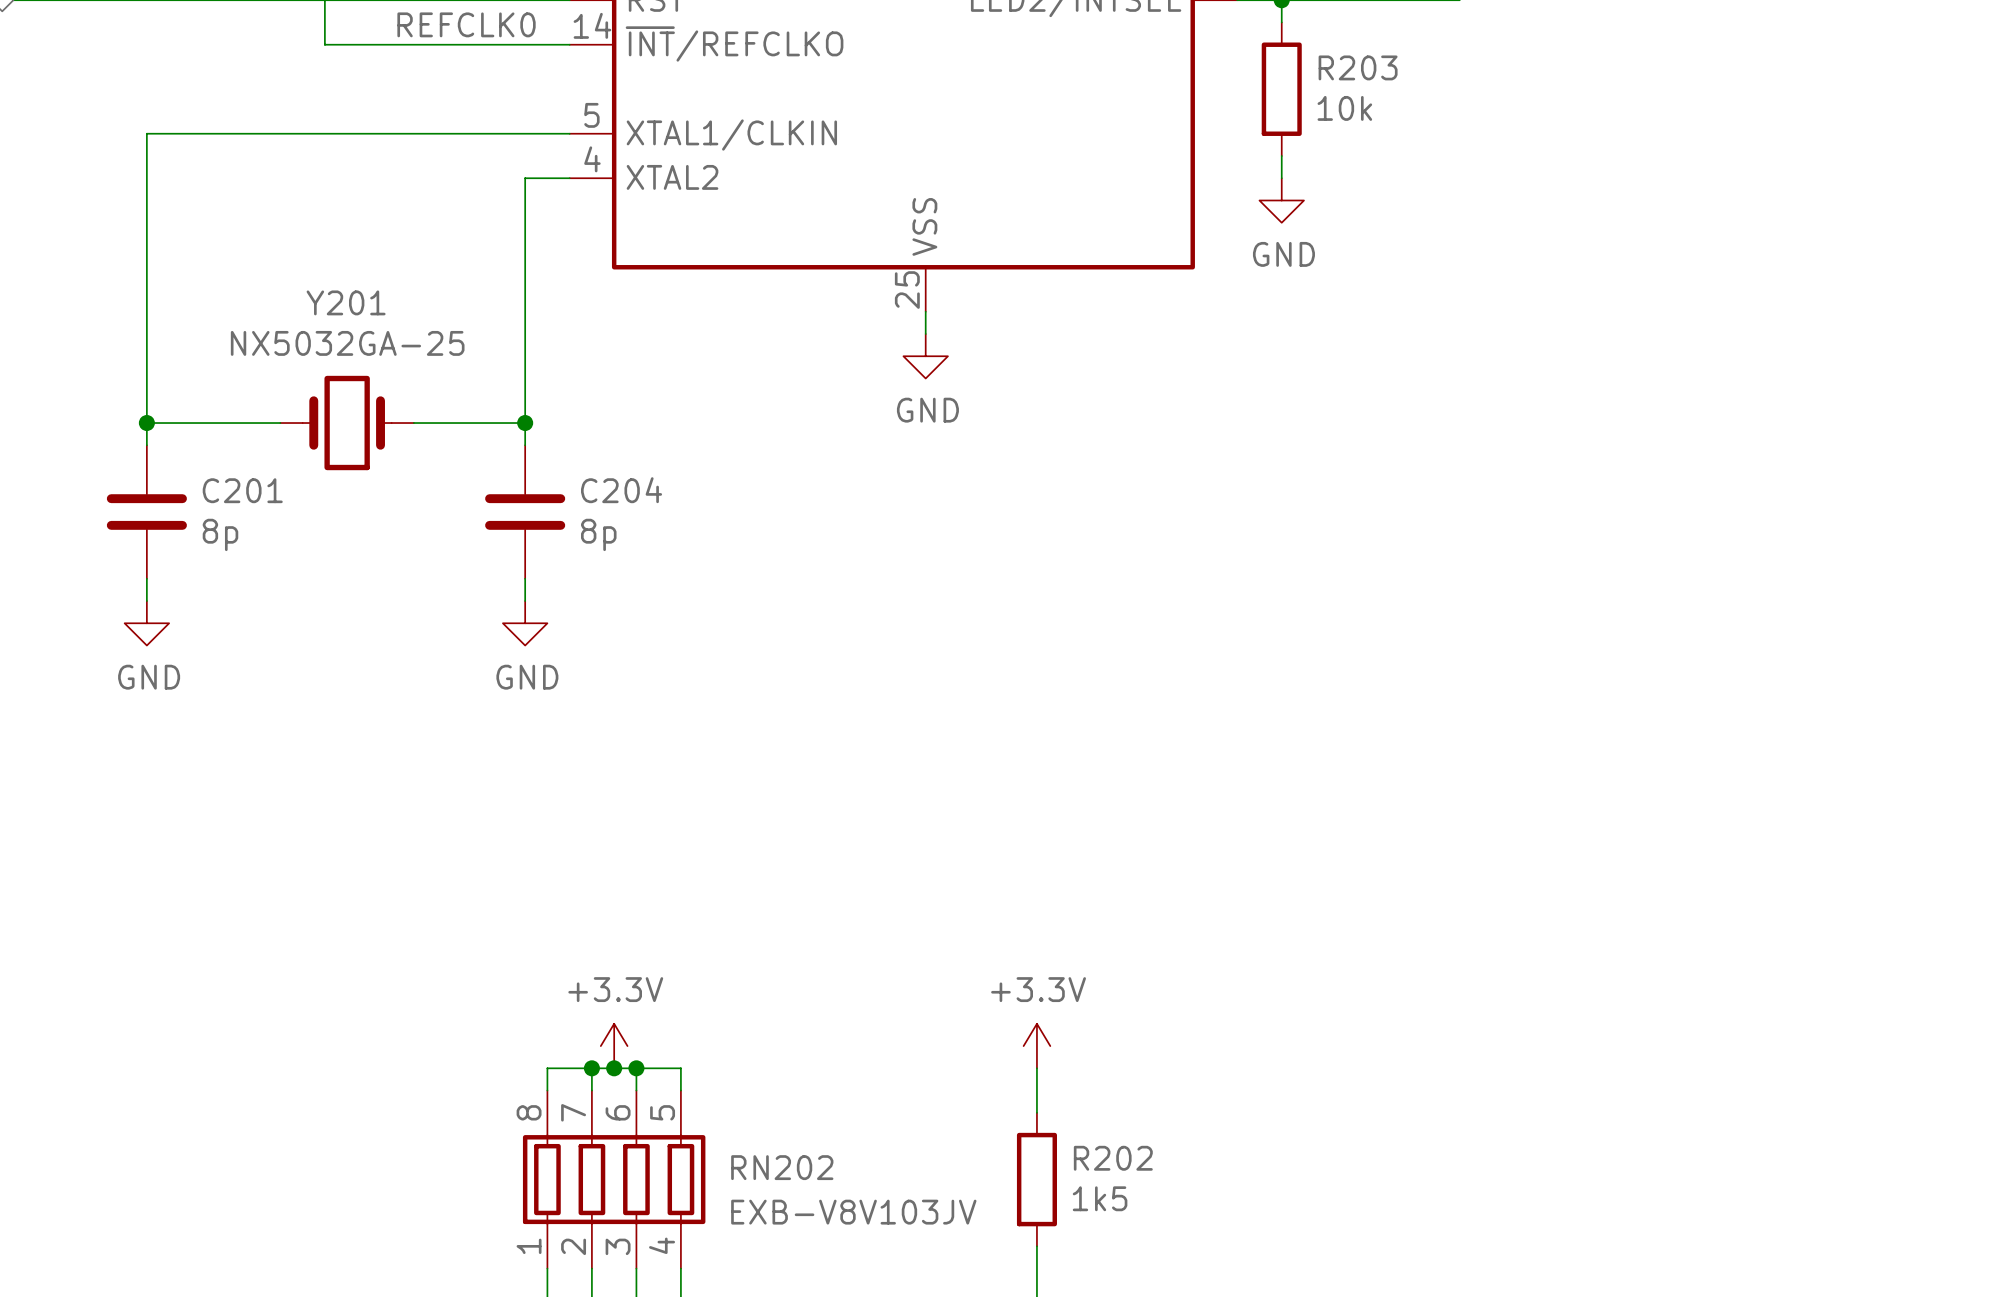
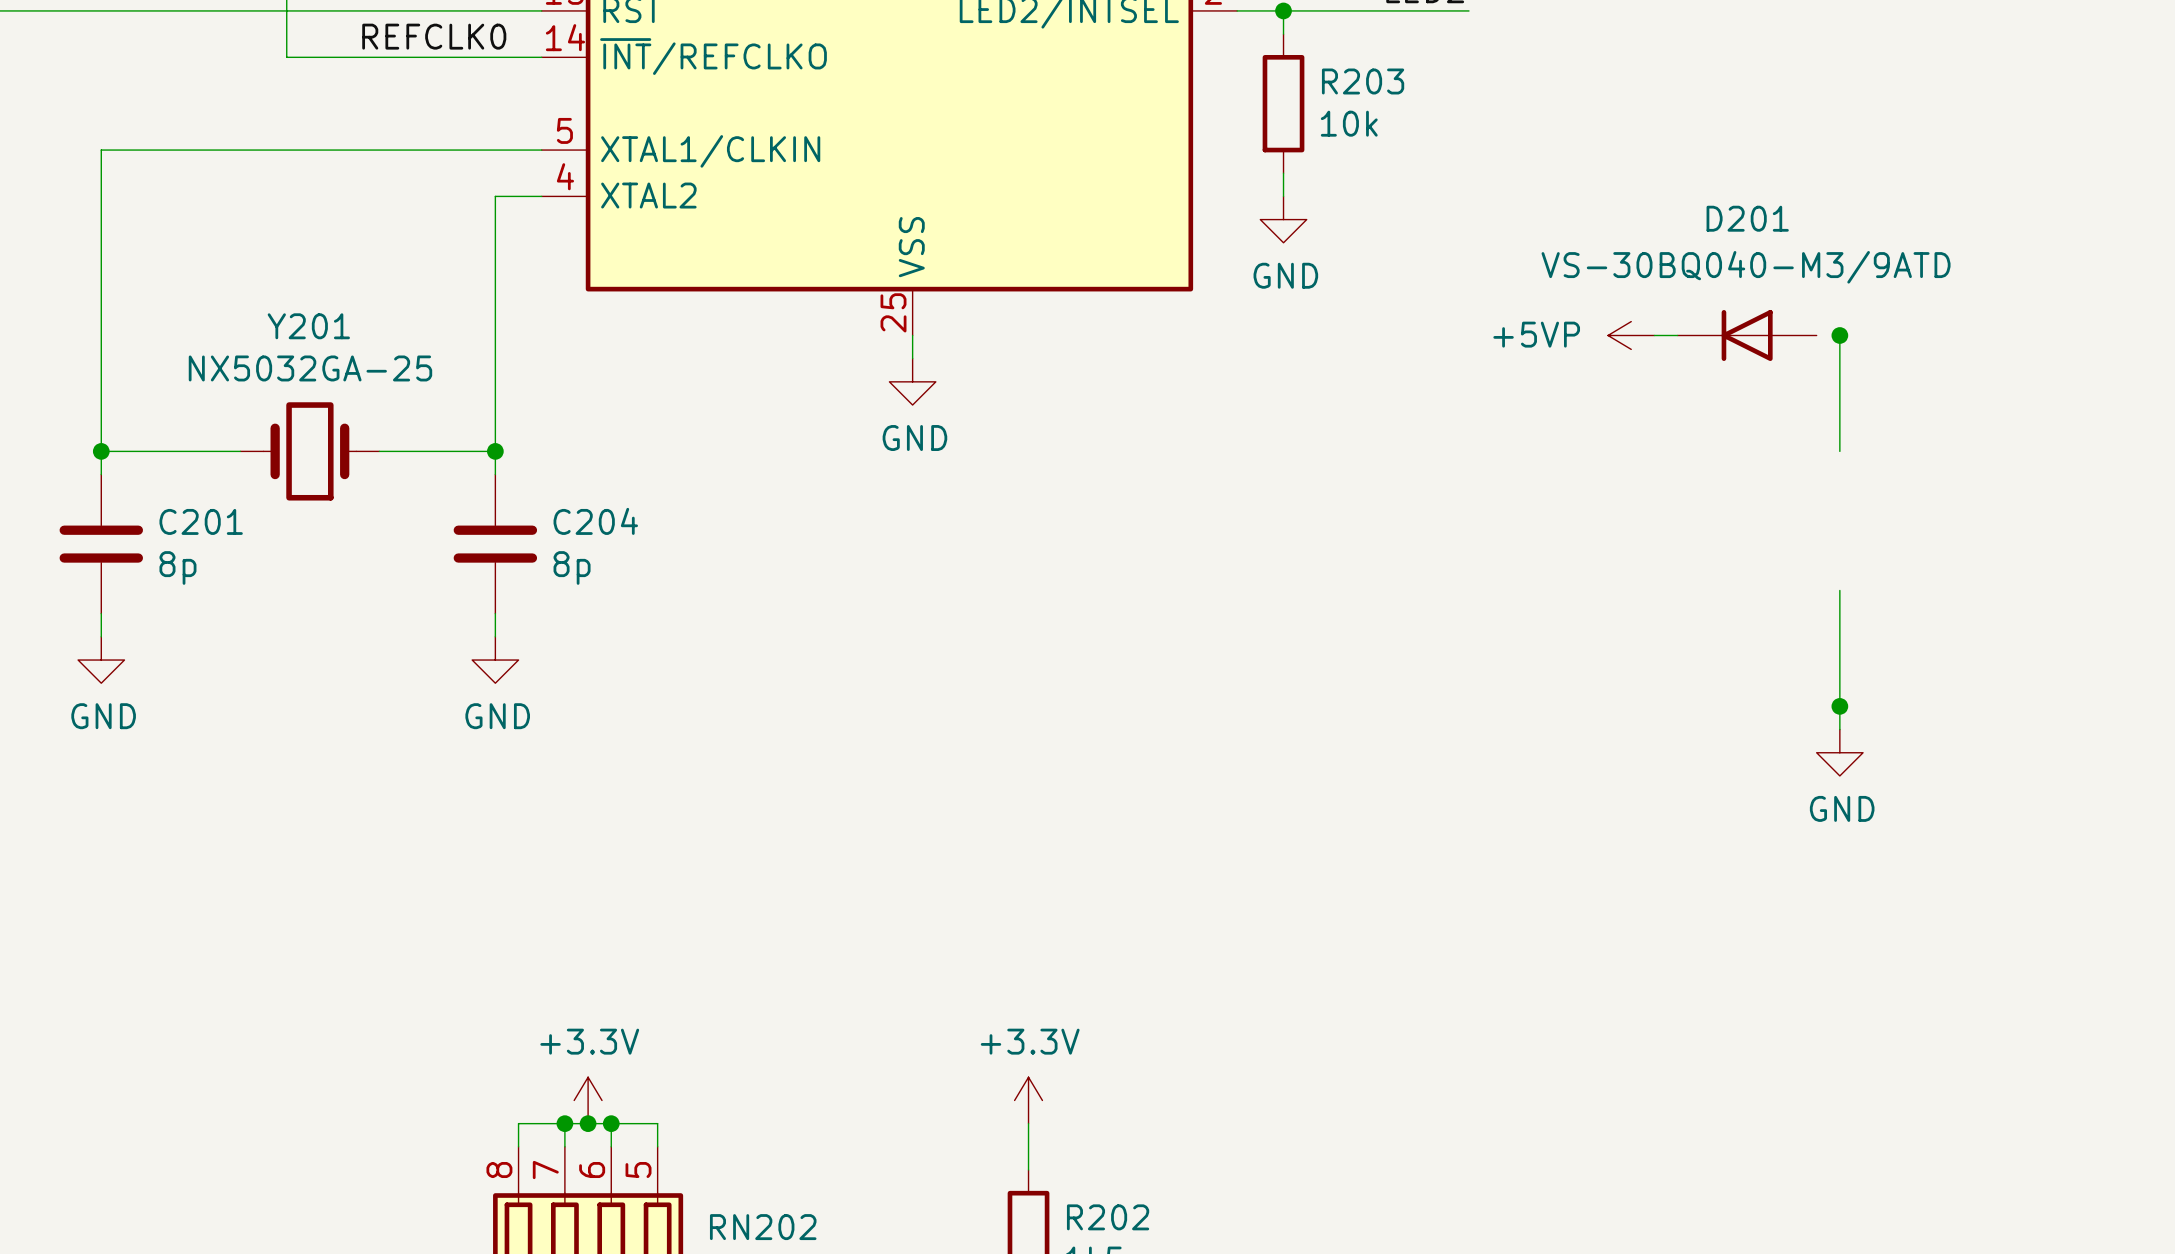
power symbol: none -> +5VP (1631, 335)
wire: none -> (1654, 335) (1677, 335)
D201: none -> VS-30BQ040-M3/9ATD (1747, 335)
wire: none -> (1839, 335) (1839, 451)
junction: none -> (1839, 335)
wire: none -> (1839, 590) (1839, 729)
junction: none -> (1839, 706)
power symbol: none -> GND (1839, 752)

